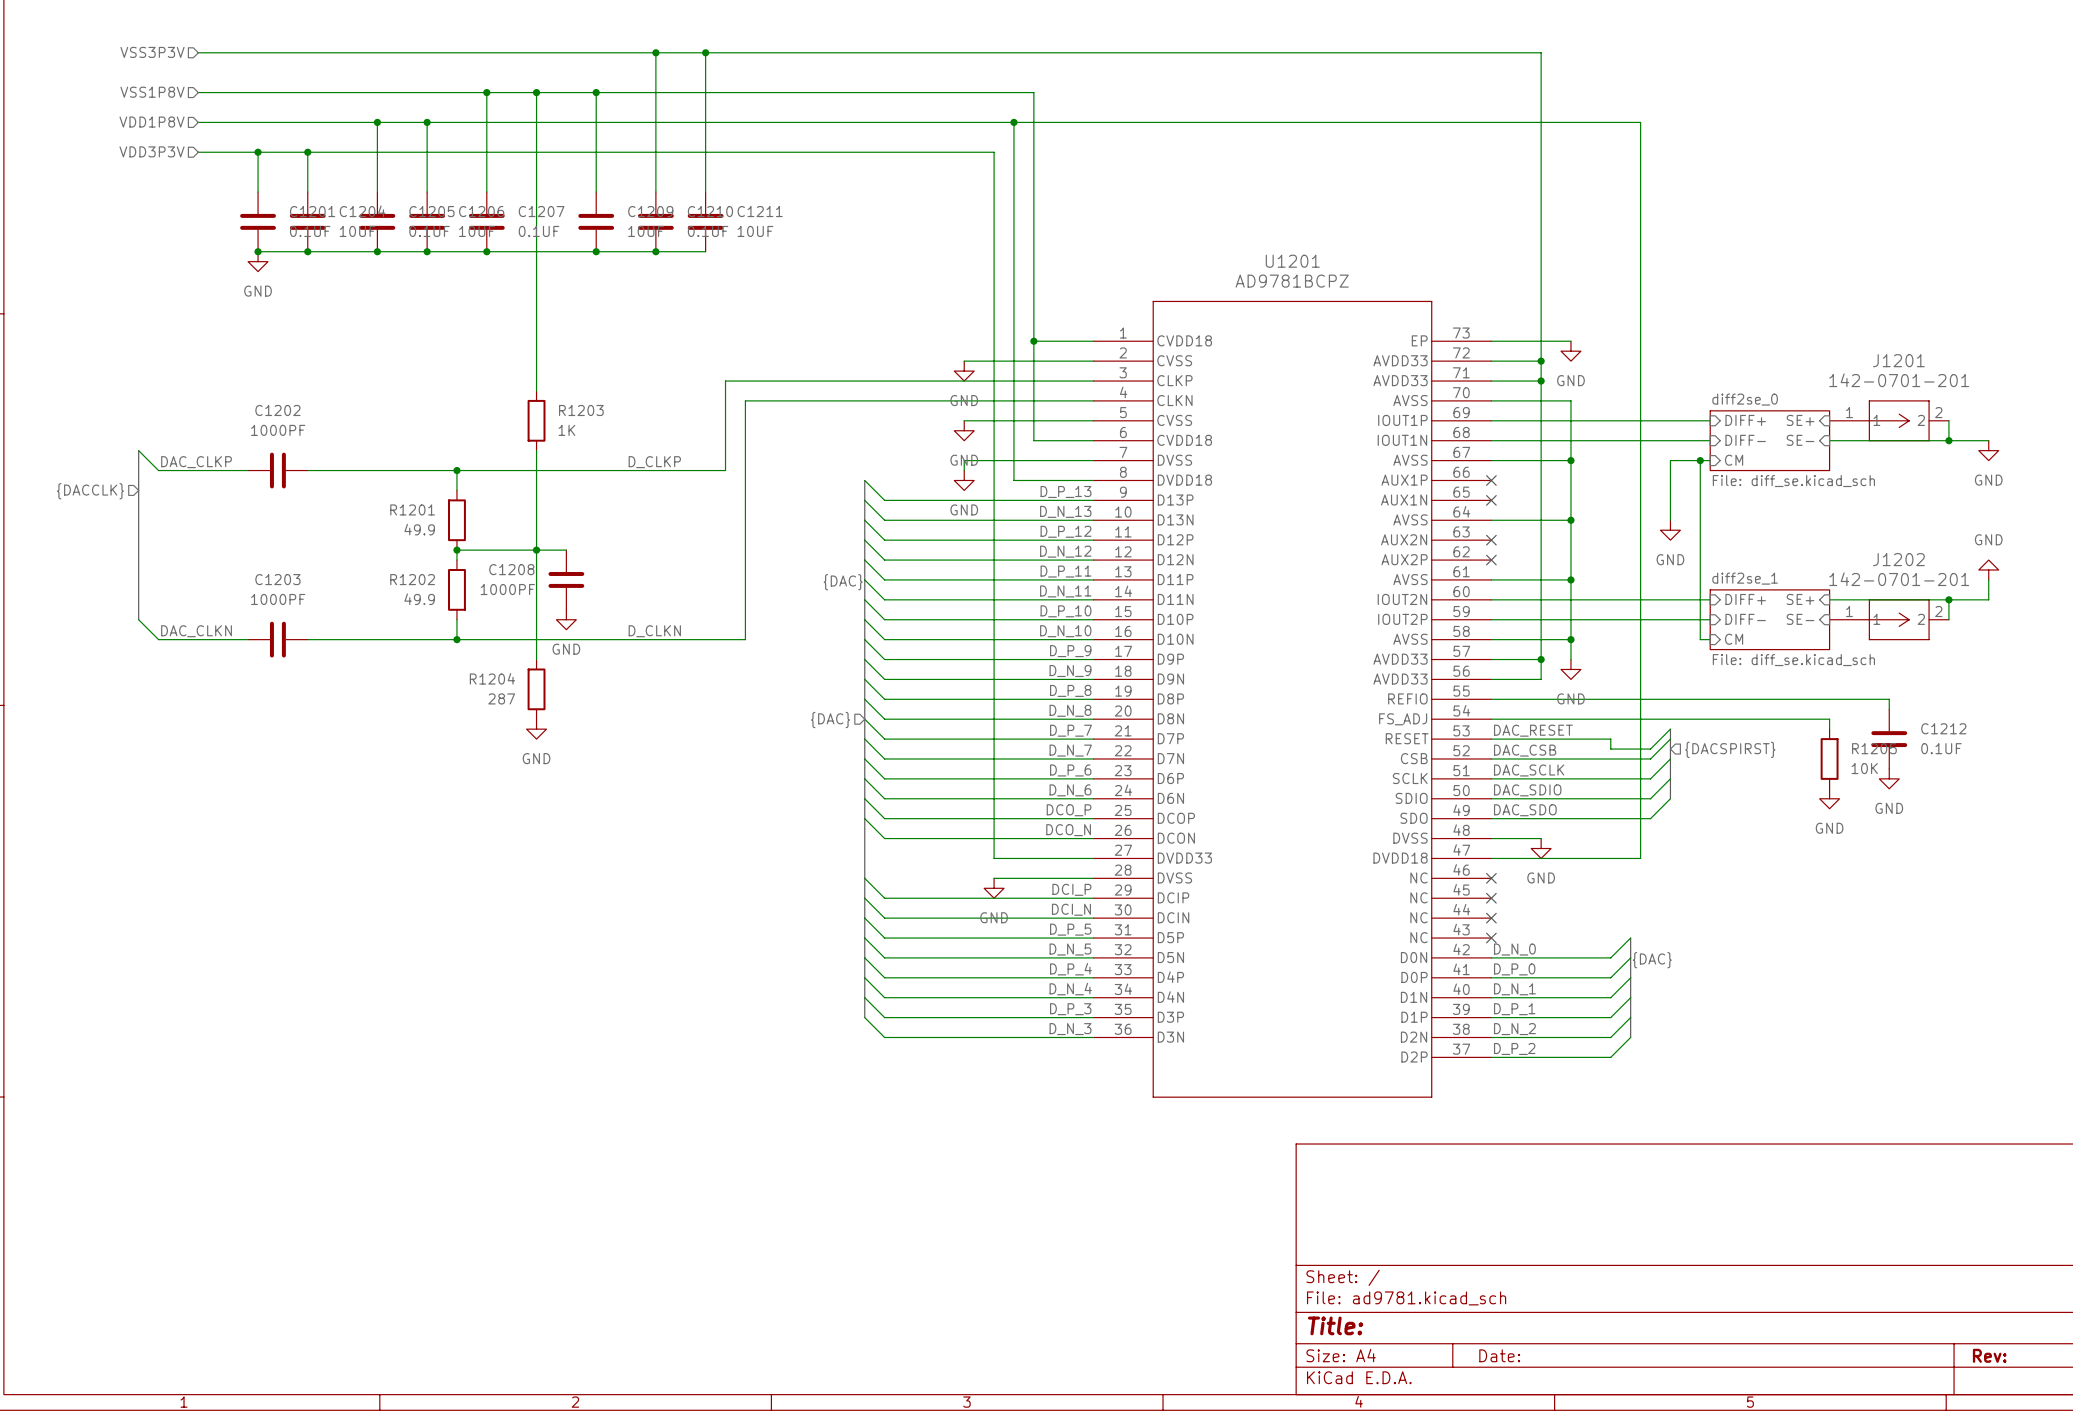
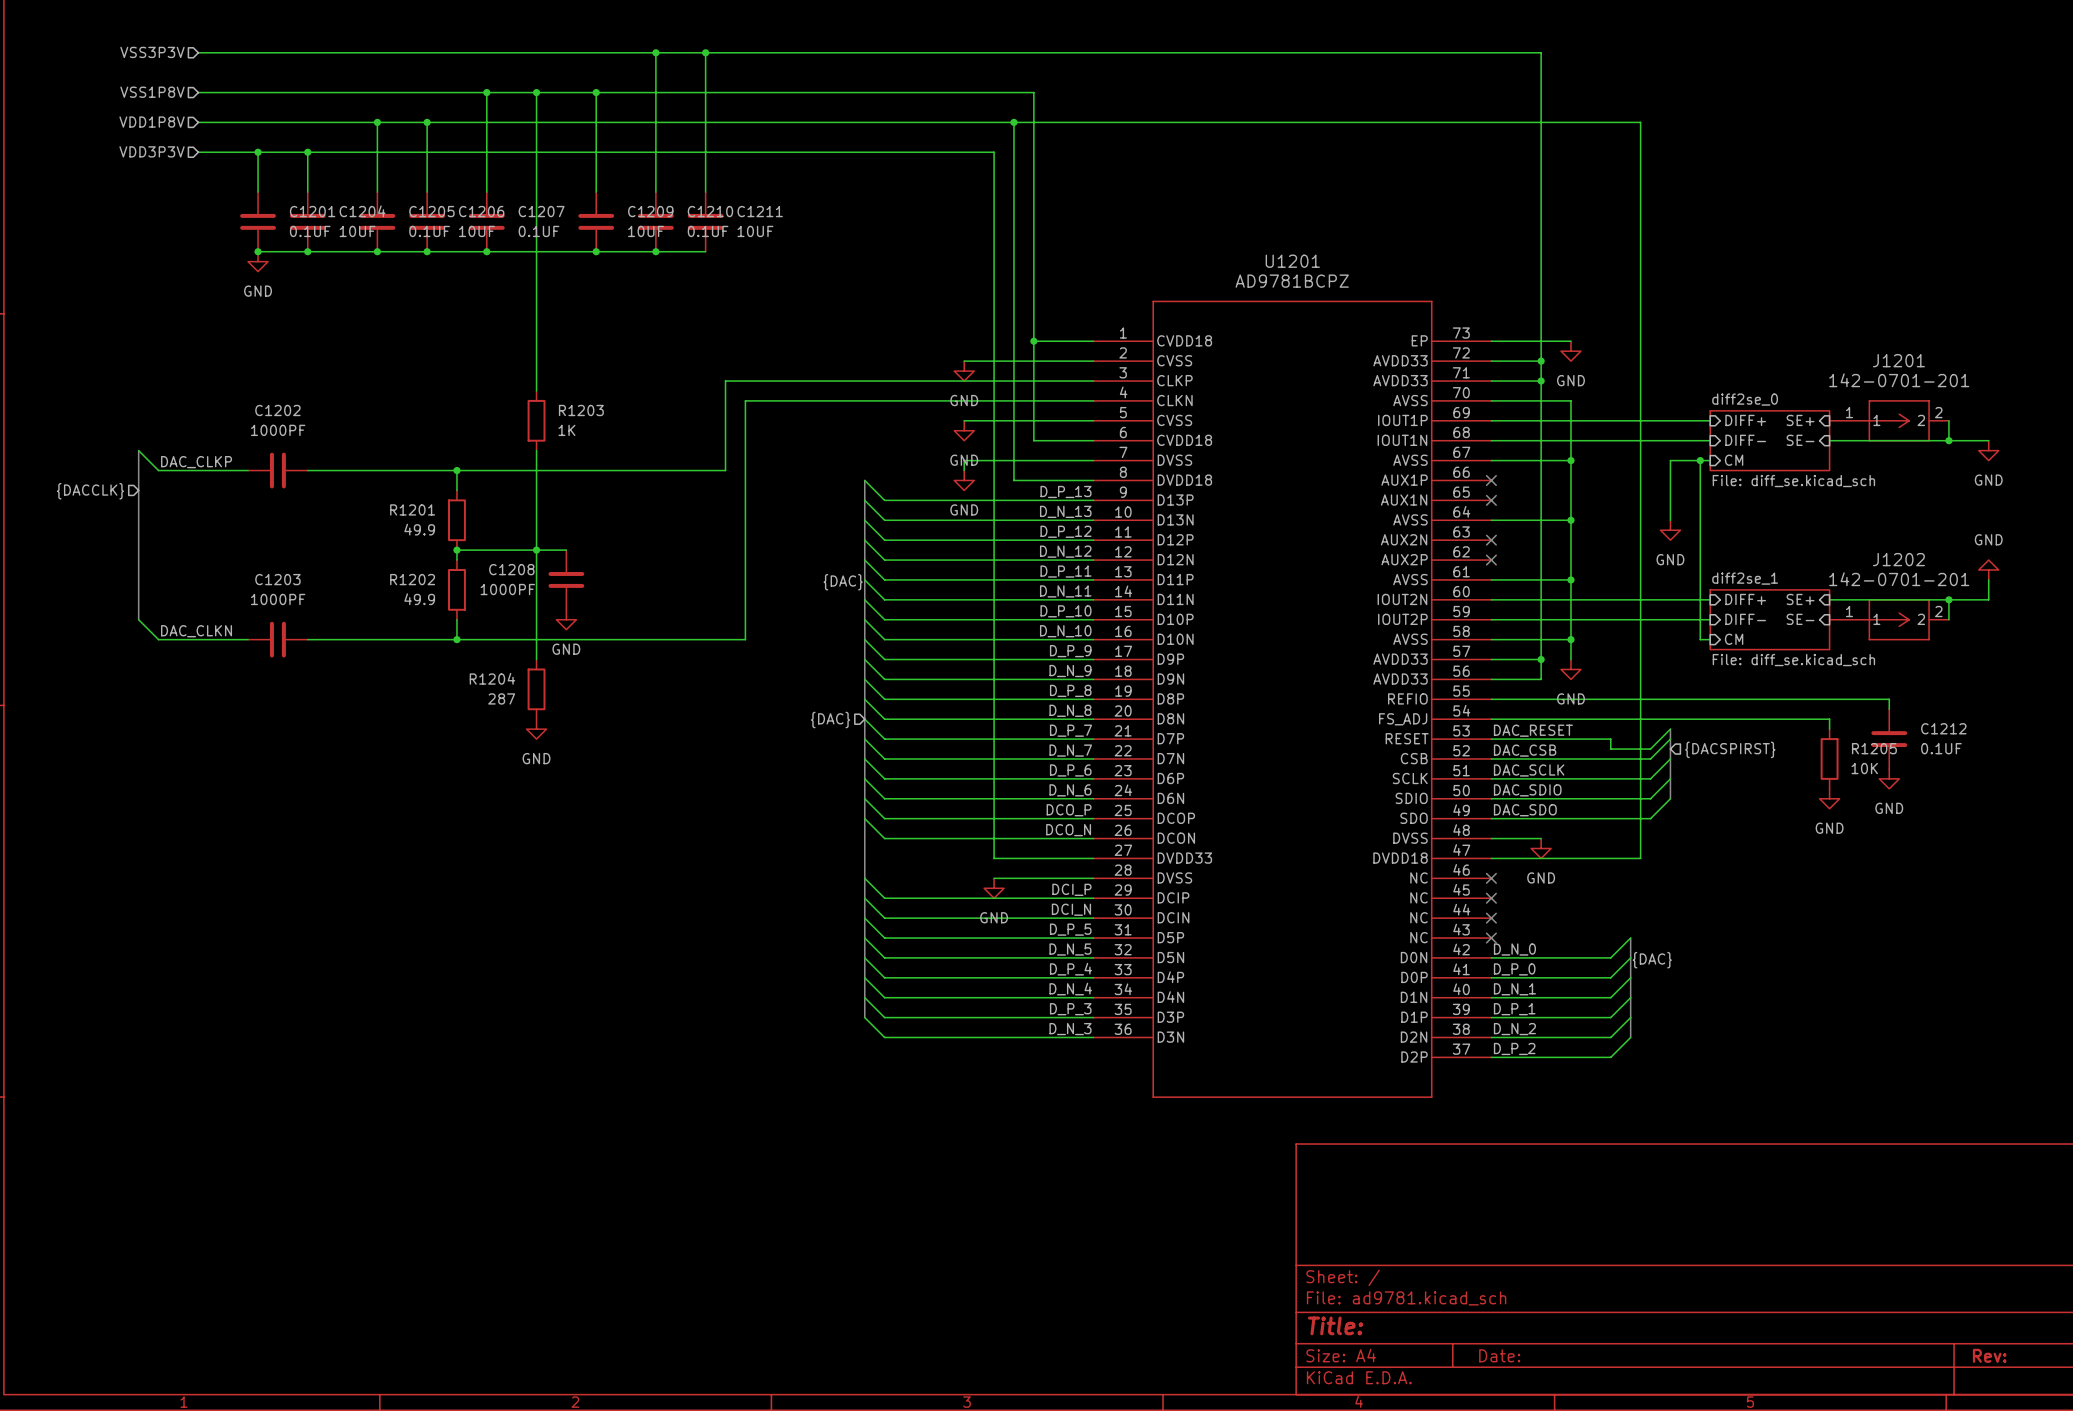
label: D_CLKP (654, 462) -> none
label: D_CLKN (654, 631) -> none

